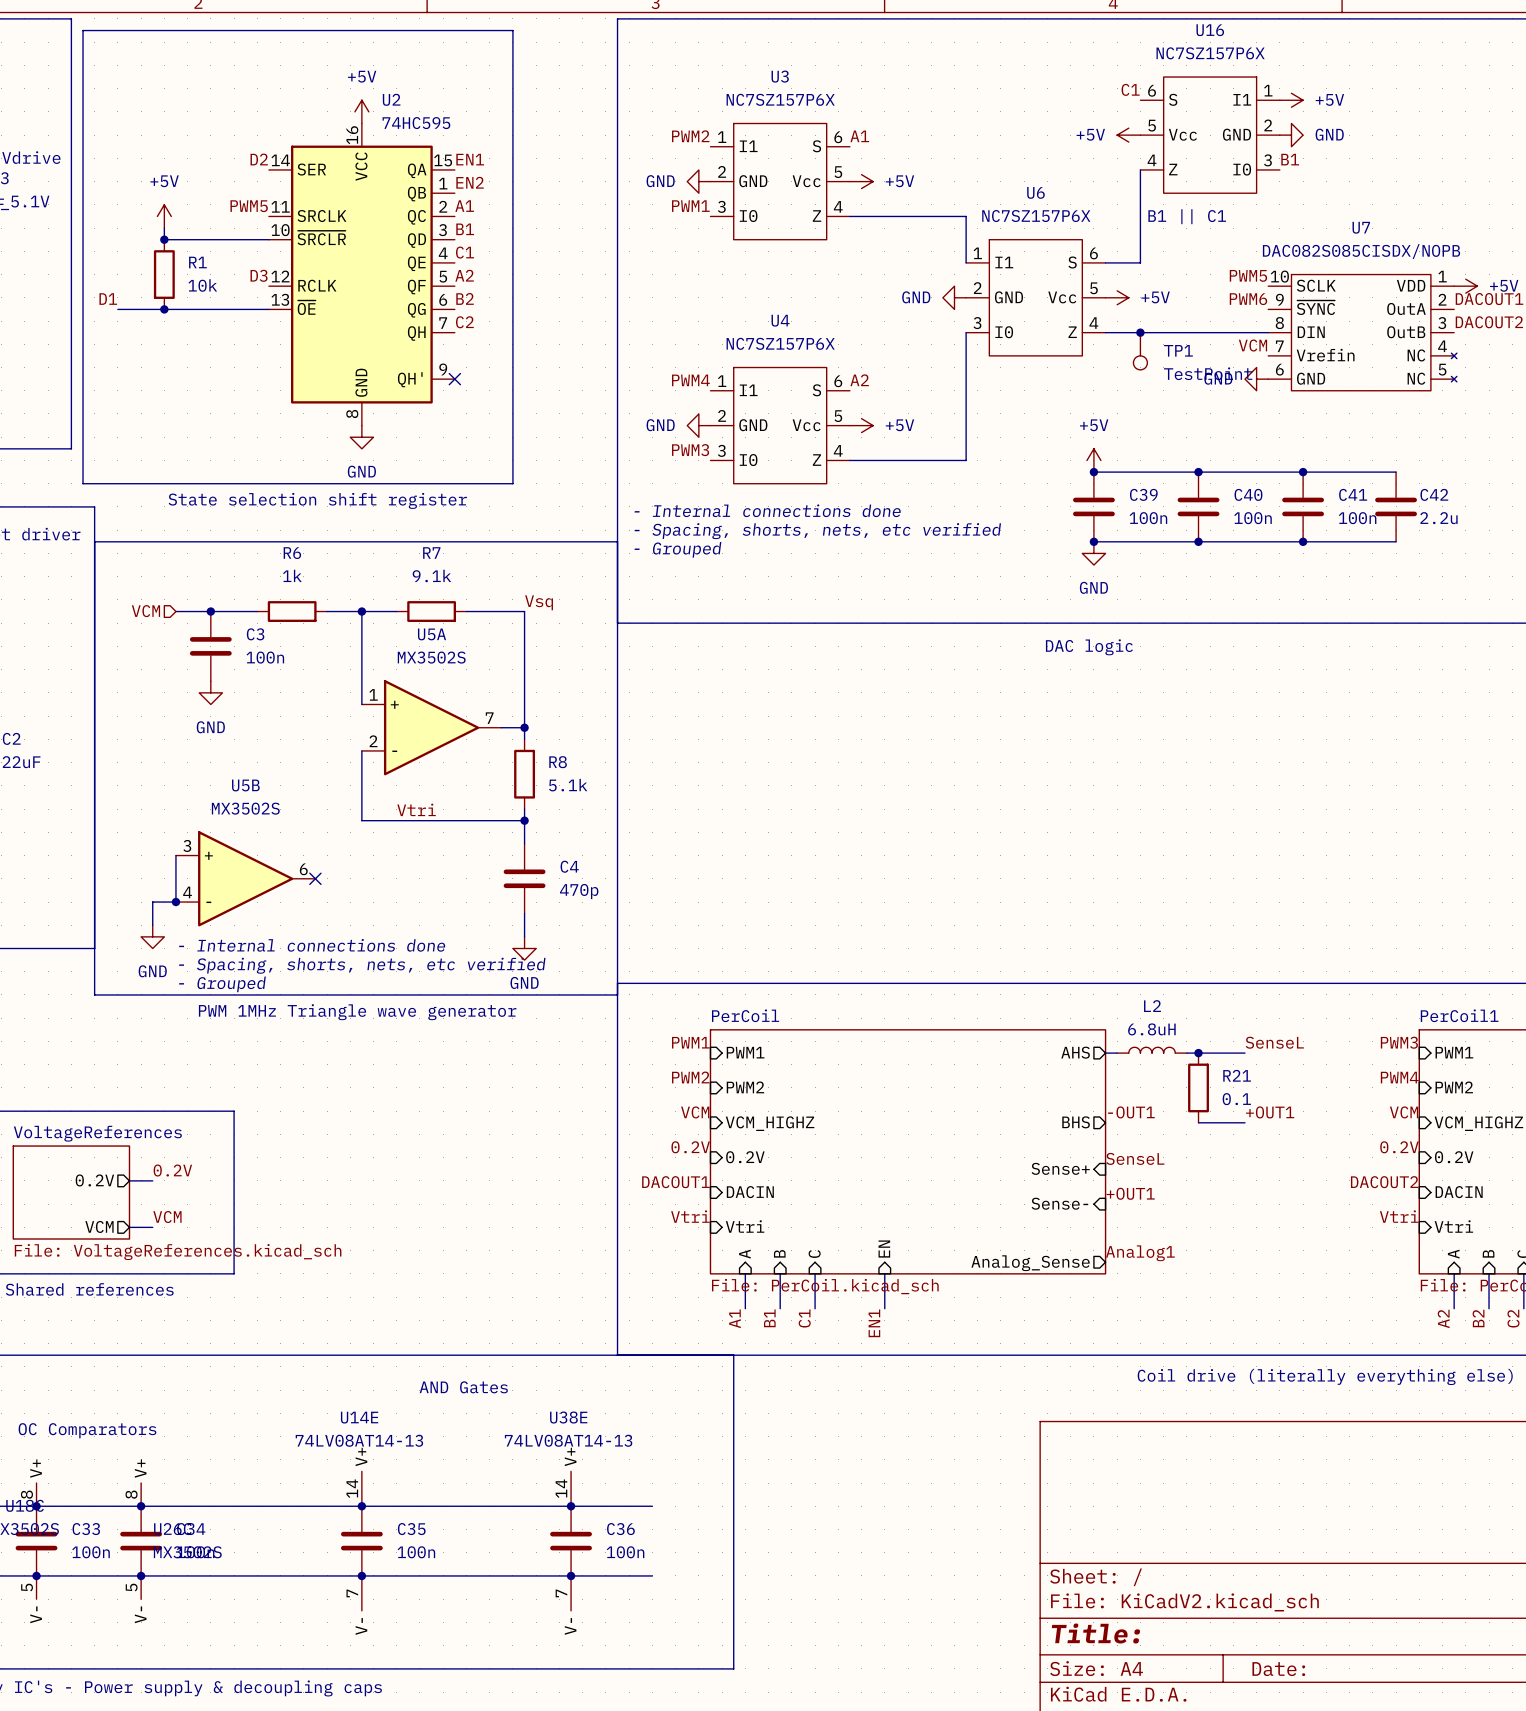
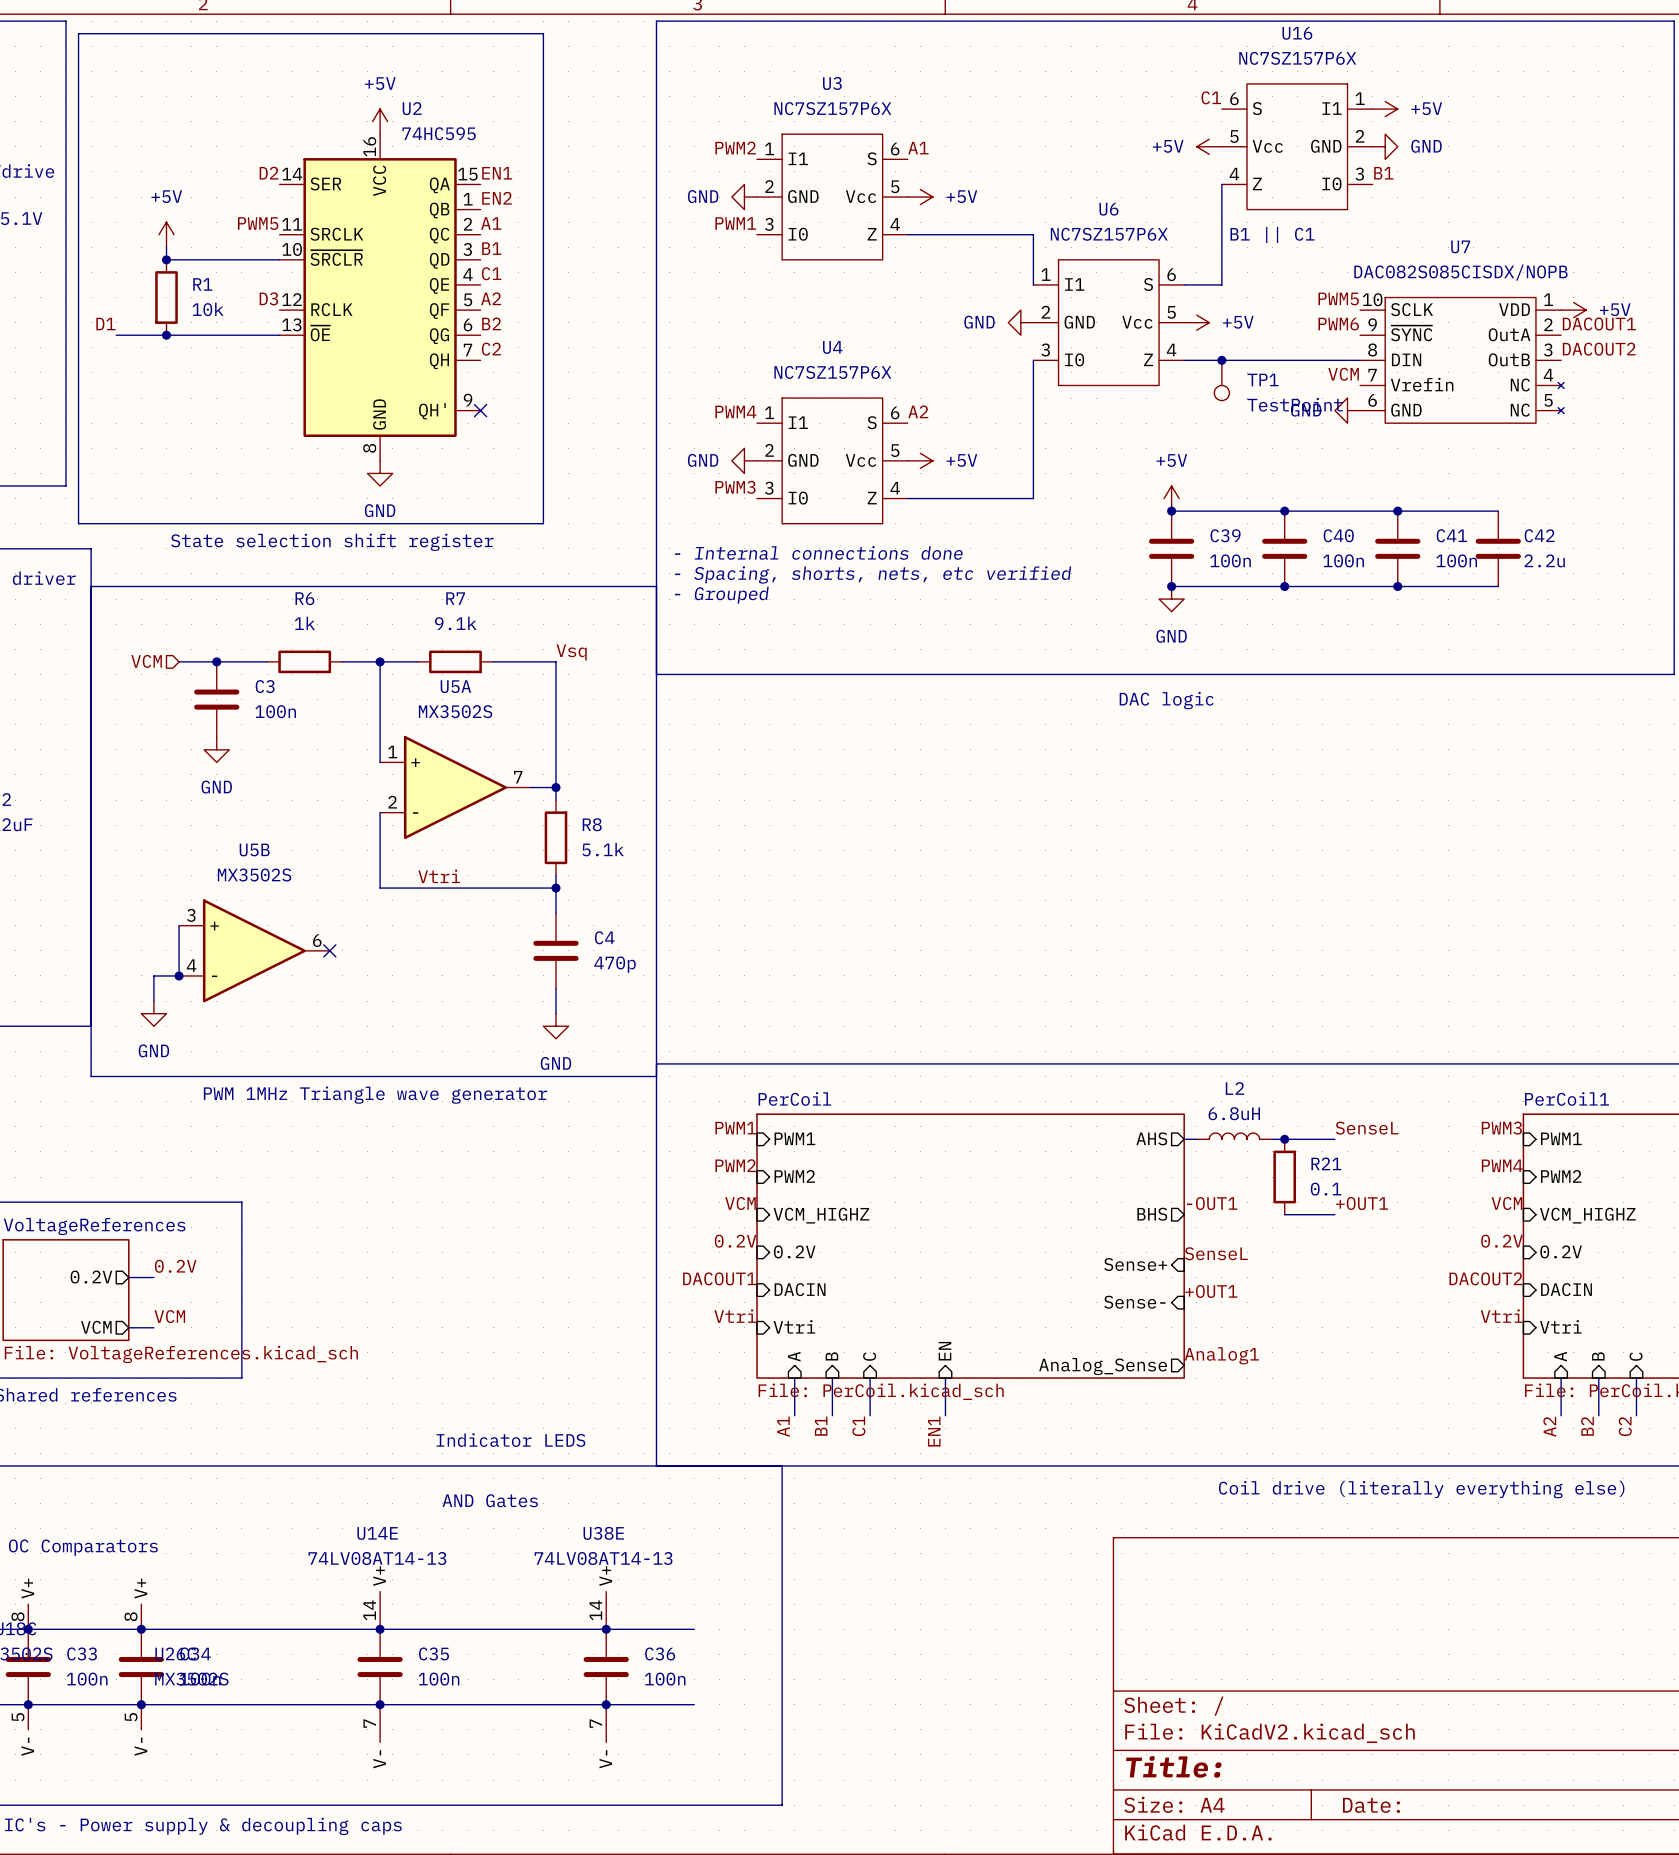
text: - Internal connections done (312, 945) -> none
text: - Spacing, shorts, nets, etc verified (362, 965) -> none
text: - Grouped (222, 984) -> none
text: none -> Indicator LEDS (510, 1440)

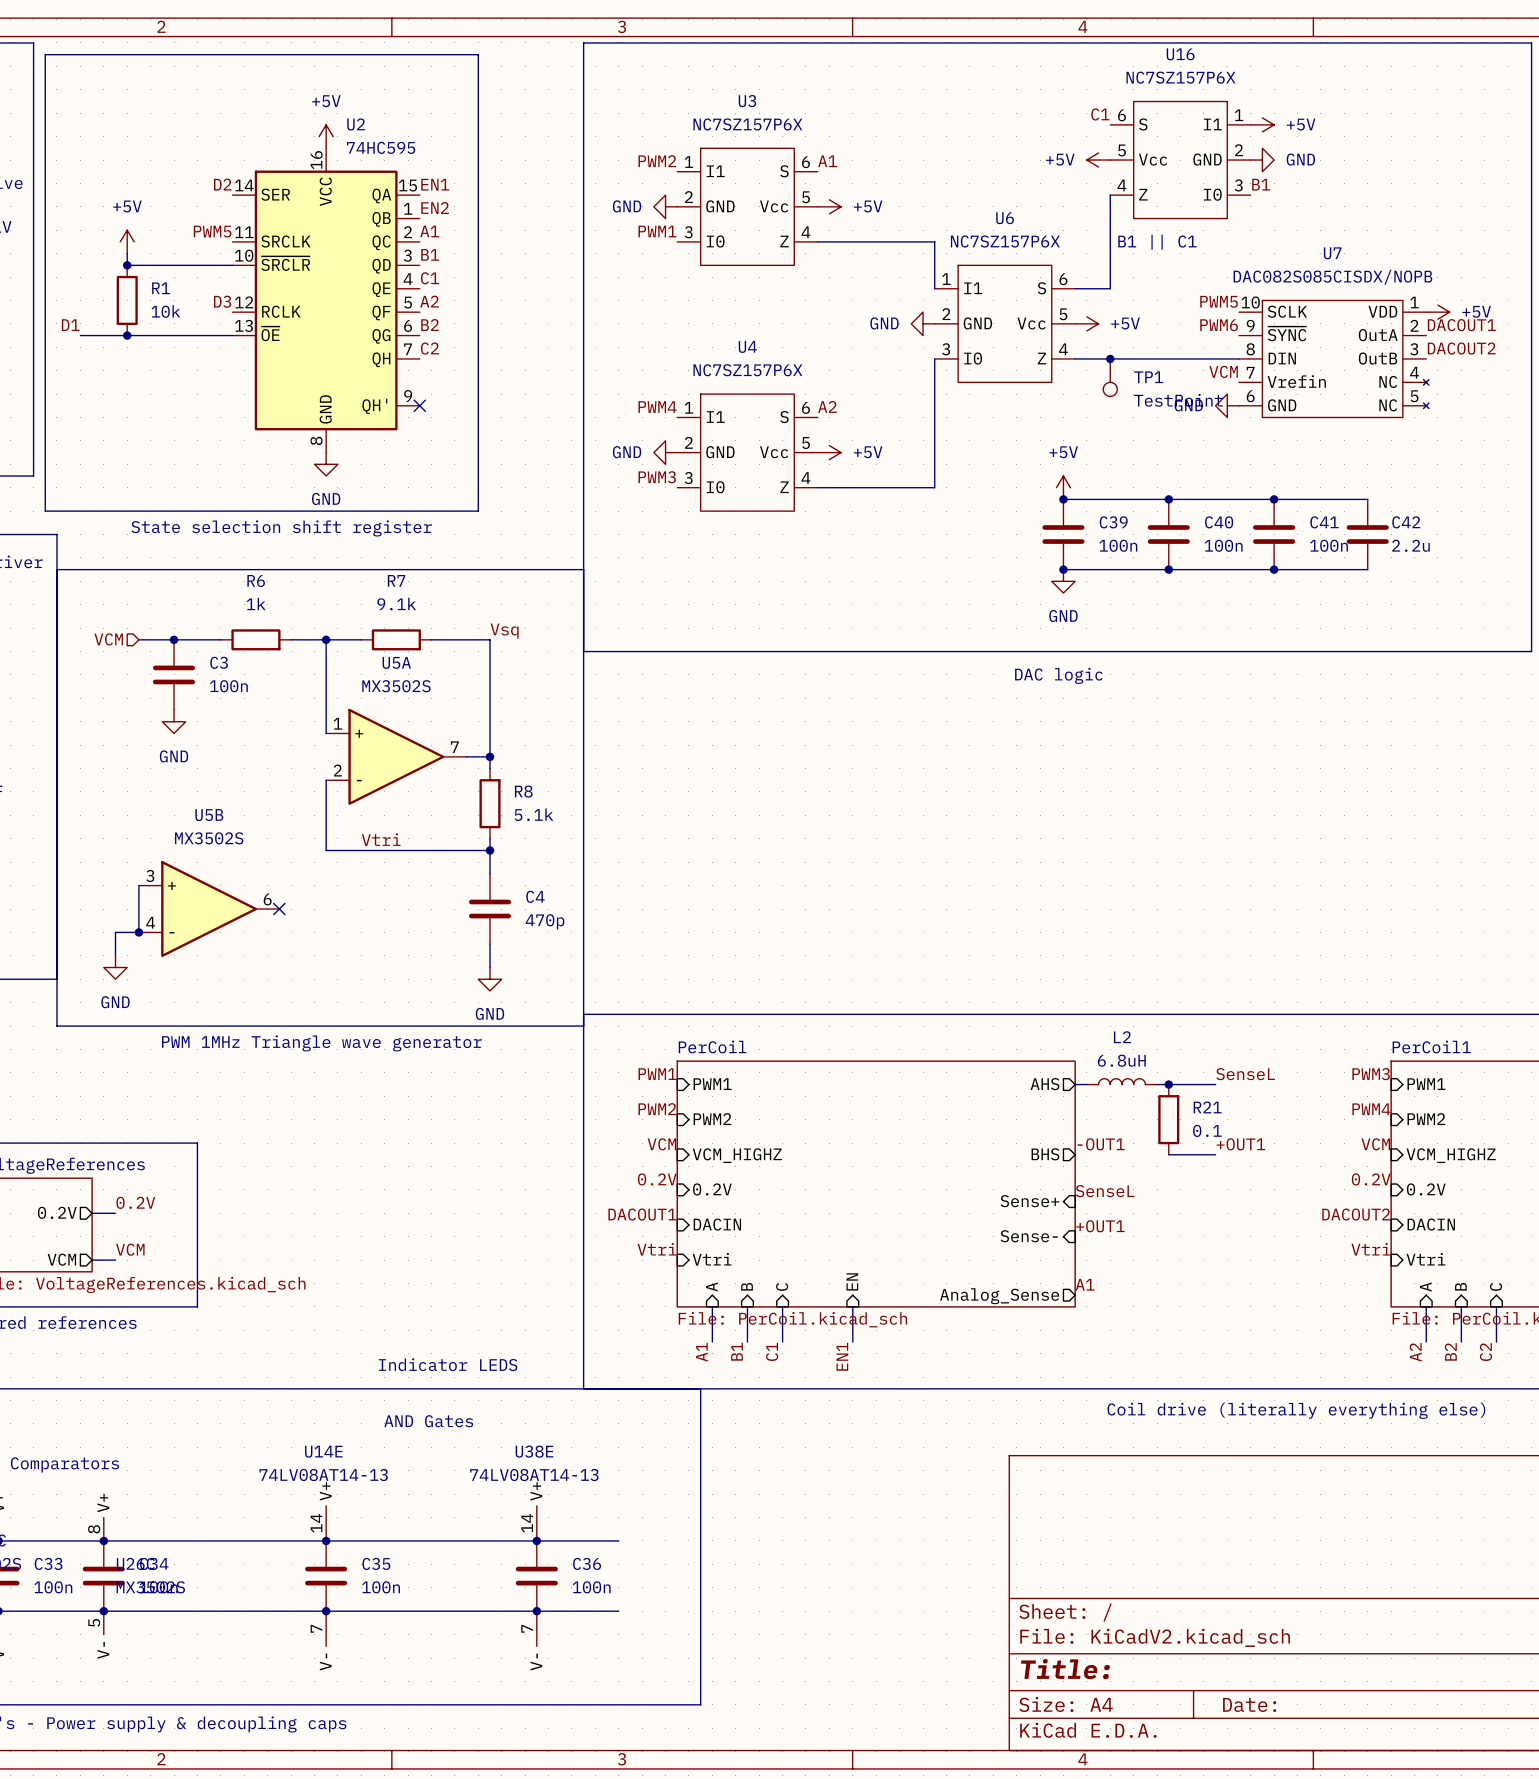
text: - Internal connections done (818, 552) -> none
text: - Spacing, shorts, nets, etc verified (873, 574) -> none
text: - Grouped (721, 595) -> none
label: Analog1 (1221, 1355) -> A1 (1085, 1284)

